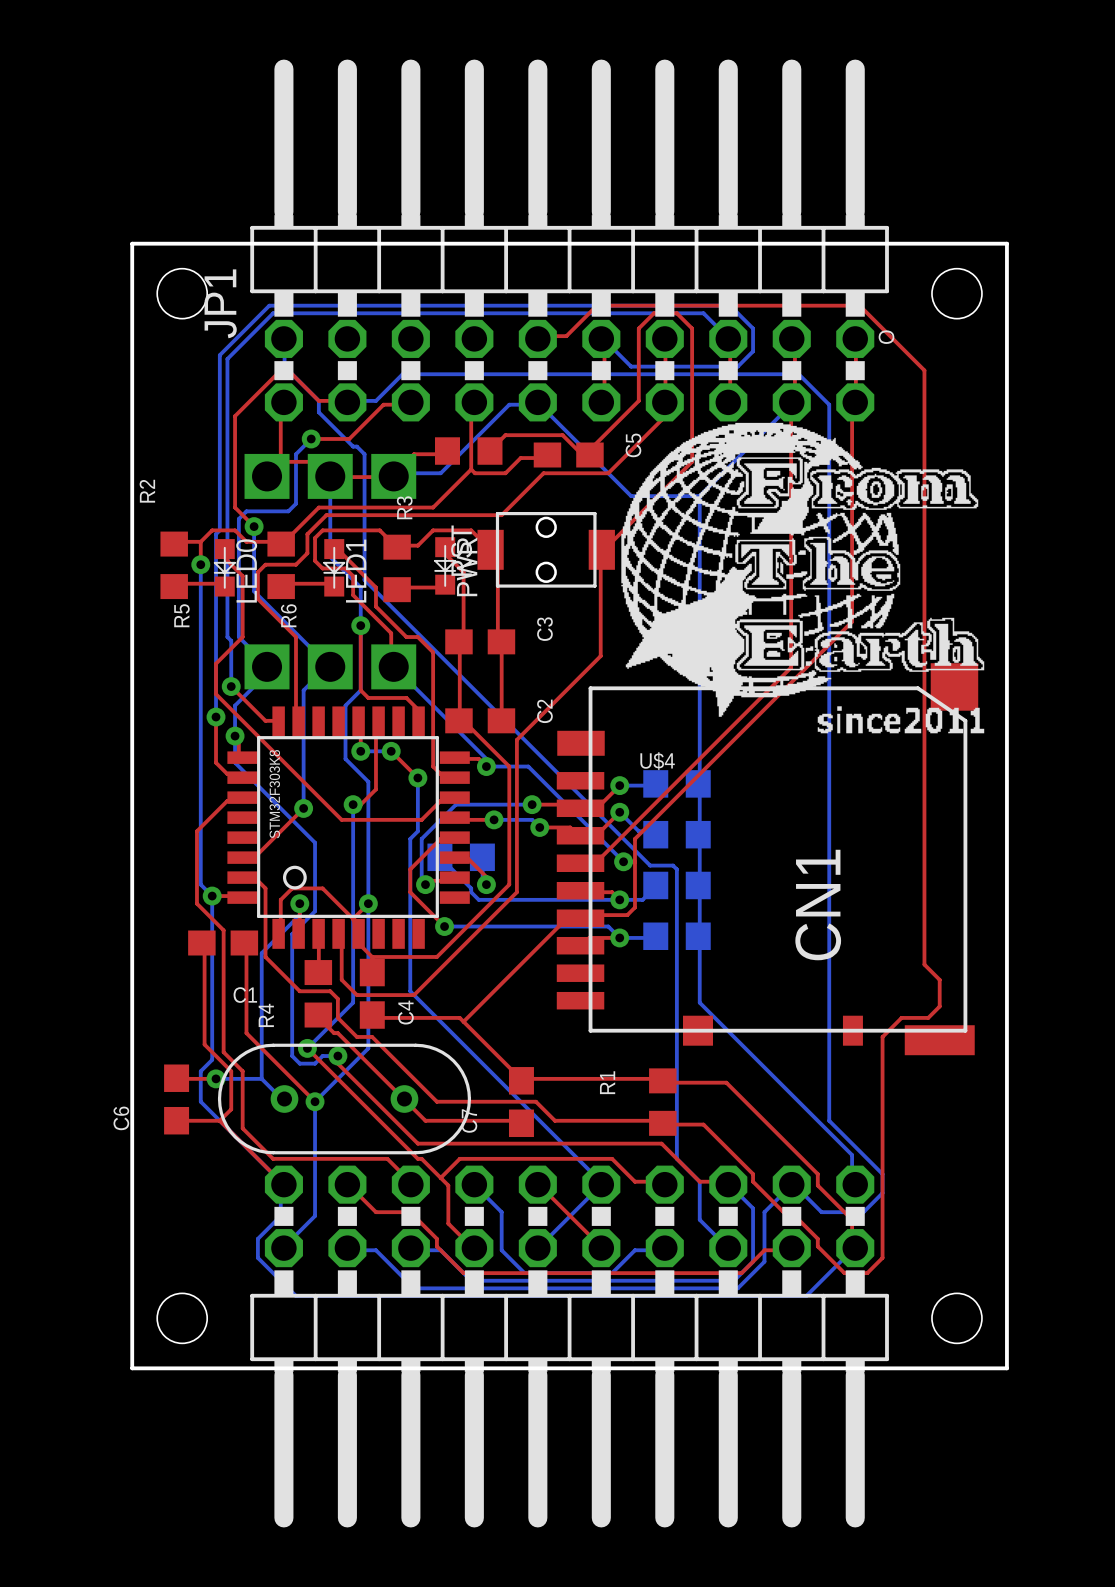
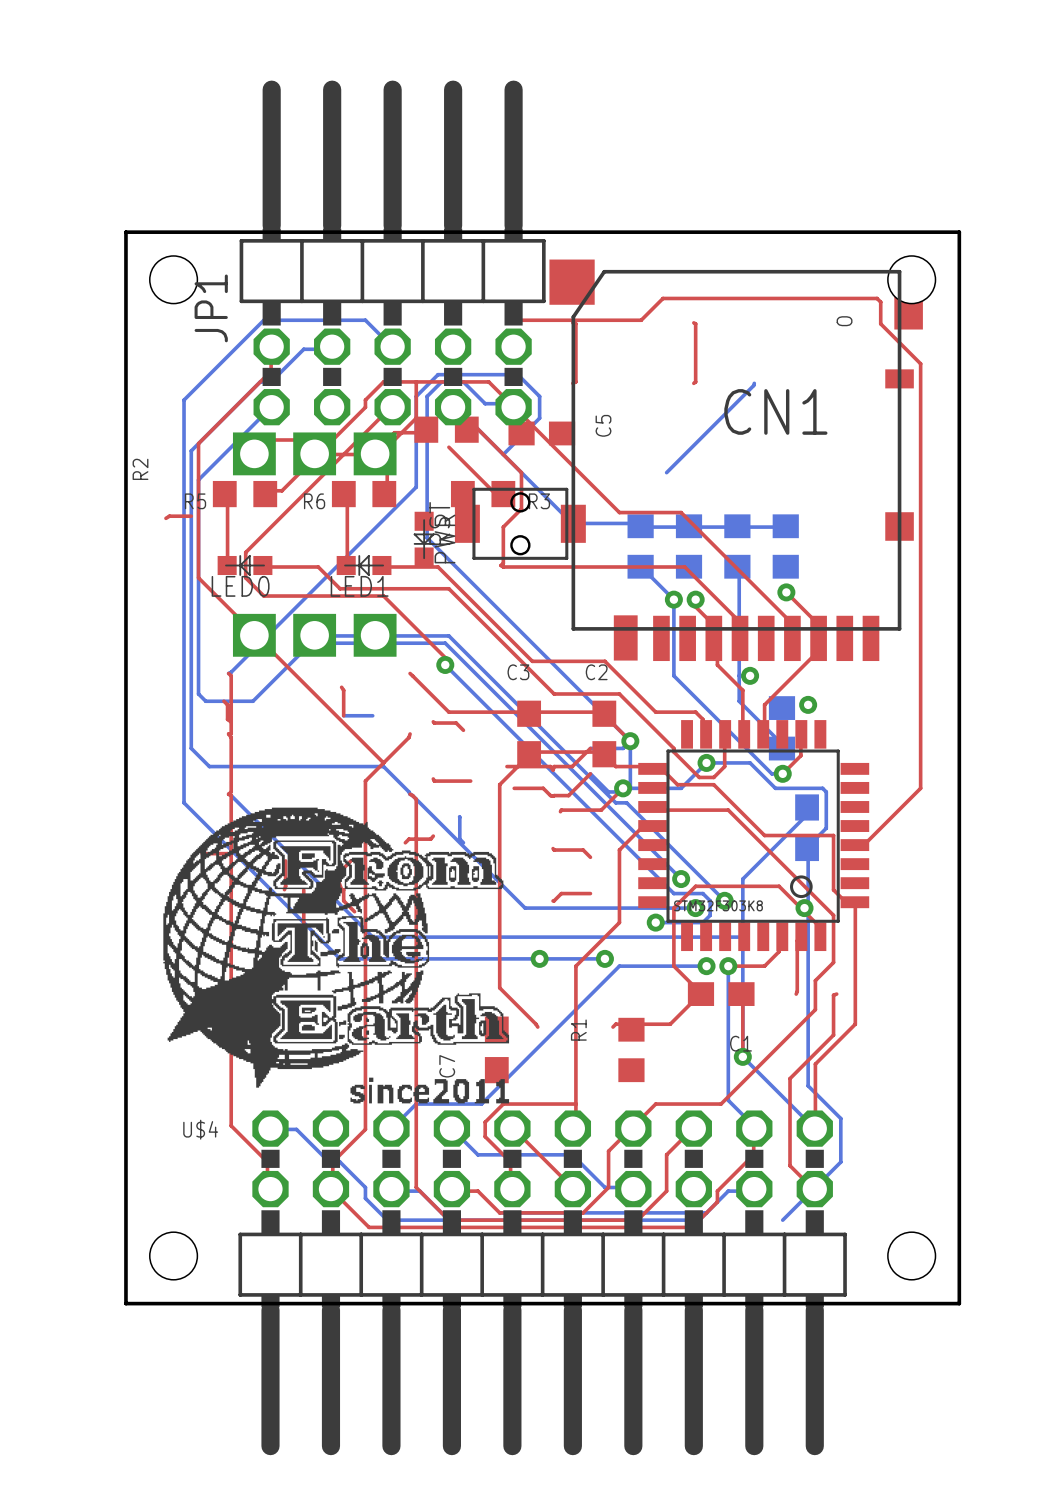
JP1 footprint: [250, 59, 889, 422] -> [239, 80, 546, 426]
JP1 name position: JP1 (220, 303) -> JP1 (211, 308)
top track: (566, 336) (596, 305) (859, 305) (924, 370) (924, 964) (939, 979) (939, 1006) (928, 1017) (901, 1017) (882, 1036) (882, 1257) (867, 1273) (844, 1273) (817, 1246) (817, 1238) (791, 1212) (783, 1212) (753, 1181) (753, 1174) (703, 1124) (665, 1124) (661, 1120) (555, 1120) (535, 1101) (436, 1101) (372, 1036) (356, 1036) (337, 1017) (337, 998) (330, 991) (299, 991) (265, 956) (265, 888) (257, 880) (242, 880) (242, 877) -> (539, 320) (641, 320) (663, 298) (877, 298) (880, 302) (880, 323) (920, 363) (920, 788) (866, 842) (855, 842) (854, 845)
bottom track: (283, 338) (284, 366) (318, 400) (318, 412) (353, 446) (356, 446) (364, 454) (364, 579) (650, 865) (673, 865) (676, 869) (676, 1158) (699, 1181) (699, 1219) (728, 1248) -> none
bottom track: (601, 338) (631, 366) (737, 366) (753, 351) (753, 328) (730, 305) (269, 305) (219, 355) (219, 530) (216, 534) (216, 717) -> none
top track: (664, 338) (665, 400) (661, 404) (661, 419) (608, 473) (543, 473) (501, 515) (326, 515) (307, 534) (307, 553) (296, 564) (265, 564) (257, 572) (257, 579) -> (392, 407) (245, 552)
bottom track: (728, 338) (703, 313) (273, 313) (227, 359) (227, 637) (231, 640) (231, 686) -> none
top track: (791, 338) (794, 339) (794, 400) (791, 404) (791, 667) (596, 861) (580, 863) -> none
top track: (855, 338) (855, 400) (852, 404) (852, 621) (634, 838) (634, 907) (627, 915) (581, 915) (577, 918) (566, 918) (463, 1021) -> none
top track: none -> (271, 346) (271, 371) (198, 443) (198, 577) (383, 762)
bottom track: none -> (332, 346) (329, 349) (303, 349) (271, 381) (260, 381) (191, 450) (191, 537)
bottom track: none -> (392, 346) (365, 320) (263, 320) (184, 400) (184, 802) (340, 958) (604, 958)
top track: none -> (416, 381) (416, 418) (387, 447) (387, 490) (384, 494)
top track: (283, 402) (280, 404) (280, 461) -> none
bottom track: (347, 402) (375, 400) (402, 374) (798, 374) (829, 404) (829, 1120) (848, 1139) -> (623, 788) (681, 788) (706, 762) (750, 762) (775, 788) (822, 788) (826, 791) (826, 828) (807, 847) (808, 1085)
top track: (347, 402) (318, 400) (292, 374) (276, 374) (235, 416) (235, 507) (254, 526) -> none
top track: (410, 402) (410, 404) (383, 404) (349, 438) (311, 438) -> none
top track: (474, 402) (471, 404) (471, 469) (433, 507) (318, 507) (281, 544) (280, 541) (246, 541) (235, 530) (212, 530) (200, 541) (200, 564) -> none
bottom track: none -> (271, 407) (198, 479) (198, 694) (205, 701) (252, 701) (318, 635) (448, 635) (615, 802) (626, 802) (724, 900)
bottom track: none -> (453, 407) (456, 407) (572, 523) (637, 523) (641, 527) (785, 526)
top track: none -> (453, 407) (456, 407) (521, 472) (521, 508) (503, 527) (503, 563) (500, 565) (684, 566) (739, 621) (740, 638)
bottom track: none -> (513, 407) (510, 403) (485, 403) (463, 381) (441, 381) (427, 396) (427, 537) (630, 741) (630, 788)
bottom track: (311, 438) (296, 454) (296, 503) (288, 511) (246, 511) (238, 518) (238, 637) (267, 666) (265, 675) (235, 705) (235, 762) (315, 842) (315, 911) (292, 934) (292, 1056) (299, 1063) (315, 1063) (322, 1056) (337, 1056) -> none
via: (311, 438) -> none
top track: (489, 451) (505, 435) (562, 435) (581, 454) (593, 454) (593, 446) (638, 400) (638, 328) (654, 313) (676, 313) (692, 328) (692, 461) (604, 549) (601, 549) (600, 656) (516, 739) (516, 892) (414, 995) (356, 995) (341, 979) (341, 934) (338, 933) -> none
top track: (547, 455) (547, 458) (520, 458) (505, 473) (475, 473) -> (503, 494) (503, 490) (492, 490) (452, 450)
bottom track: (330, 476) (330, 557) (360, 587) (360, 690) (345, 705) (345, 758) (368, 781) (368, 1048) (315, 1101) (315, 1215) (283, 1248) -> none
bottom track: (393, 476) (395, 473) (440, 473) (509, 404) (535, 404) (537, 402) (631, 496) (699, 496) (699, 1002) (852, 1155) (852, 1181) -> (807, 807) (804, 810) (804, 817) (742, 879) (742, 1056) (811, 1125)
bottom track: none -> (503, 454) (539, 418) (539, 396) (517, 374) (438, 374) (416, 396) (416, 487) (228, 673)
top track: none -> (224, 494) (227, 494) (227, 565)
top track: none -> (265, 494) (267, 490) (281, 490) (365, 407) (365, 400) (383, 381) (488, 381) (619, 512) (681, 512) (790, 621) (790, 635) (792, 638)
top track: none -> (343, 494) (347, 494) (346, 565)
bottom track: (254, 526) (254, 591) (330, 666) (326, 667) (303, 690) (303, 808) -> none
via: (254, 526) -> none
top track: (445, 547) (448, 549) (448, 557) (463, 572) (463, 637) (458, 641) (459, 717) -> none
top track: (224, 549) (227, 549) (227, 560) (242, 576) (242, 637) (216, 663) (216, 694) (341, 819) (421, 819) (440, 800) (452, 800) (454, 797) -> none
top track: (334, 549) (337, 549) (375, 587) (375, 606) (406, 637) (417, 637) (433, 652) (433, 766) (440, 774) (452, 774) (454, 777) -> none
via: (200, 564) -> none
R5 rotation: 0° (174, 565) -> 90° clockwise (245, 494)
R5 position: (174, 565) -> (245, 494)
R6 rotation: 0° (281, 565) -> 90° clockwise (364, 494)
R6 position: (281, 565) -> (364, 494)
LED0 rotation: 0° (224, 567) -> 90° clockwise (245, 565)
LED0 position: (224, 567) -> (245, 565)
LED1 rotation: 0° (334, 567) -> 90° clockwise (364, 565)
LED1 position: (334, 567) -> (364, 565)
R3 rotation: 0° (397, 568) -> 90° clockwise (483, 494)
R3 position: (397, 568) -> (483, 494)
part: none -> (640, 546)
part: none -> (689, 546)
part: none -> (737, 546)
part: none -> (785, 546)
U$4 position: (802, 578) -> (336, 955)
top track: (445, 584) (444, 587) (398, 587) (397, 589) -> none
top track: (174, 586) (177, 583) (223, 583) (224, 586) -> none
top track: (281, 586) (284, 583) (334, 583) (334, 586) -> none
top track: none -> (262, 565) (318, 566) (340, 588) (448, 588) (554, 694) (619, 694) (673, 748) (673, 752) (699, 777) (713, 777) (724, 766) (725, 734)
top track: none -> (381, 565) (438, 566) (532, 661) (604, 661) (655, 712) (695, 712) (702, 719) (702, 733) (706, 734)
bottom track: none -> (640, 566) (673, 599) (673, 675) (771, 773) (782, 773)
bottom track: none -> (737, 566) (739, 566) (739, 701) (779, 741) (779, 748) (781, 748)
top track: (257, 598) (296, 637) (296, 720) (298, 721) -> (245, 570) (245, 577) (263, 596) (383, 596) (445, 657) (445, 664)
top track: none -> (786, 592) (815, 621) (815, 635) (818, 638) (815, 639) (815, 654) (764, 704) (763, 734)
via: none -> (786, 592)
top track: (360, 625) (360, 690) (368, 697) (406, 697) (417, 709) (418, 721) -> none
via: (360, 625) -> none
C3 name position: C3 (544, 629) -> C3 (518, 672)
via: none -> (673, 599)
top track: none -> (695, 599) (695, 606) (713, 625) (713, 638) (717, 639) (717, 664) (742, 690) (744, 734)
via: none -> (695, 599)
C3 rotation: 0° (480, 641) -> 90° clockwise (529, 733)
C3 position: (480, 641) -> (529, 733)
bottom track: (393, 666) (486, 758) (486, 766) (528, 766) (623, 861) -> none
top track: (393, 666) (391, 663) (391, 633) (353, 595) (353, 576) (345, 568) (322, 568) (315, 560) (315, 538) (322, 530) (379, 530) (397, 547) (417, 545) (433, 530) (471, 530) (497, 557) (497, 640) (501, 641) (501, 644) (501, 720) -> none
bottom track: none -> (325, 650) (332, 643) (445, 643) (681, 879)
top track: (231, 686) (265, 720) (278, 721) -> none
via: (231, 686) -> none
bottom track: none -> (445, 664) (673, 893) (702, 893) (710, 900) (710, 915) (702, 922) (655, 922)
via: none -> (445, 664)
top track: none -> (410, 673) (448, 712) (528, 712) (529, 713) (532, 712) (601, 712) (630, 741)
via: none -> (750, 675)
C2 name position: C2 (544, 711) -> C2 (596, 672)
top track: (216, 717) (216, 762) (227, 774) (238, 774) (242, 777) -> none
via: (216, 717) -> none
top track: (459, 717) (509, 766) (509, 884) (436, 956) (372, 956) (372, 972) -> none
C2 rotation: 0° (480, 720) -> 90° clockwise (604, 733)
C2 position: (480, 720) -> (604, 733)
top track: (378, 721) (375, 724) (375, 789) (360, 804) (353, 804) -> none
via: (235, 736) -> none
via: none -> (808, 704)
via: (360, 751) -> none
top track: (391, 751) (417, 777) -> none
via: (391, 751) -> none
part: none -> (781, 728)
via: (486, 766) -> none
top track: none -> (410, 733) (409, 737) (365, 781) (365, 1129) (332, 1162) (332, 1187) (330, 1189) (369, 1227) (692, 1227) (706, 1212)
top track: none -> (801, 734) (800, 755) (782, 773)
bottom track: (417, 777) (417, 831) (410, 838) (410, 991) (600, 1181) (600, 1185) (537, 1248) -> none
via: (417, 777) -> none
via: none -> (630, 741)
part: (677, 783) -> none
bottom track: (200, 785) (200, 884) (212, 896) (212, 1059) (200, 1071) (200, 1101) (283, 1184) (280, 1185) (280, 1215) (257, 1238) (257, 1257) (296, 1295) (806, 1295) (821, 1280) -> (191, 748) (209, 766) (383, 766) (525, 908) (695, 908)
via: (619, 785) -> none
top track: (242, 797) (238, 800) (227, 800) (196, 831) (196, 903) (223, 930) (223, 1052) (242, 1071) -> (228, 673) (231, 675) (231, 733) (228, 733) (231, 737) (231, 791) (228, 794) (231, 795) (231, 1020)
via: none -> (706, 762)
bottom track: (353, 804) (353, 1002) (307, 1048) -> none
via: (353, 804) -> none
bottom track: (532, 804) (455, 804) (421, 838) (421, 877) (425, 880) (425, 884) -> none
via: (532, 804) -> none
top track: (303, 808) (257, 854) (242, 854) (242, 857) -> none
via: (303, 808) -> none
via: (619, 812) -> none
via: none -> (782, 773)
bottom track: (494, 819) (532, 819) (539, 827) -> none
via: (494, 819) -> none
part: (348, 827) -> none
via: (539, 827) -> none
top track: none -> (623, 788) (601, 810) (561, 810) (560, 811)
via: none -> (623, 788)
bottom track: none -> (228, 794) (372, 937) (742, 937)
part: (677, 834) -> none
top track: (454, 837) (440, 838) (410, 869) (410, 892) (444, 926) -> none
bottom track: (439, 857) (471, 888) (471, 892) (478, 899) (642, 899) (655, 885) -> none
top track: (454, 857) (467, 857) (486, 877) (486, 884) -> none
part: (461, 857) -> none
CN1 rotation: 0° (767, 859) -> 90° counterclockwise (736, 460)
CN1 position: (767, 859) -> (736, 460)
via: (623, 861) -> none
top track: none -> (652, 826) (652, 828) (641, 828) (619, 850) (619, 922) (575, 966) (575, 1125) (572, 1128)
part: none -> (753, 835)
via: (425, 884) -> none
via: (486, 884) -> none
part: (677, 885) -> none
via: (212, 896) -> none
via: (619, 899) -> none
bottom track: (299, 903) (299, 915) (261, 953) (261, 1078) -> none
via: (299, 903) -> none
via: (368, 903) -> none
via: none -> (681, 879)
bottom track: (444, 926) (608, 926) (619, 937) (654, 937) (655, 936) -> none
via: (444, 926) -> none
top track: (278, 933) (280, 930) (280, 899) (292, 888) (322, 888) (356, 922) (358, 933) -> none
part: (677, 936) -> none
via: (619, 937) -> none
top track: (201, 943) (204, 945) (204, 1044) (231, 1071) (231, 1109) (219, 1120) -> none
C1 position: (223, 943) -> (721, 994)
top track: (244, 943) (246, 945) (246, 1033) (315, 1101) -> none
via: none -> (724, 900)
via: none -> (695, 908)
via: none -> (804, 908)
via: none -> (655, 922)
top track: none -> (782, 936) (779, 937) (779, 951) (764, 966) (728, 966)
top track: none -> (801, 936) (797, 940) (796, 994)
top track: none -> (820, 936) (819, 926) (779, 886) (695, 886) (673, 908) (673, 966) (700, 994) (670, 1024) (615, 1024) (612, 1027)
R4: (318, 993) -> none
C4 side: top (372, 993) -> bottom (807, 827)
via: none -> (539, 958)
via: none -> (604, 958)
bottom track: none -> (706, 966) (619, 966) (481, 1104) (416, 1104) (391, 1128)
via: none -> (706, 966)
bottom track: none -> (728, 966) (728, 1100) (754, 1128)
via: none -> (728, 966)
top track: (318, 1015) (318, 1017) (334, 1033) (337, 1033) (425, 1120) (520, 1120) (521, 1123) -> none
top track: (372, 1015) (375, 1017) (459, 1017) (521, 1080) (524, 1078) (661, 1078) (665, 1082) (726, 1082) (817, 1174) (817, 1185) (852, 1219) (852, 1246) -> (836, 994) (833, 995) (833, 1035) (790, 1078) (790, 1165) (811, 1187)
top track: none -> (741, 994) (742, 1056)
top track: (307, 1048) (417, 1158) (421, 1158) (448, 1185) (448, 1223) (474, 1248) -> none
via: (307, 1048) -> none
top track: (337, 1056) (337, 1063) (417, 1143) (661, 1143) (699, 1181) (726, 1181) (728, 1184) -> (441, 1212) (448, 1220) (637, 1220) (666, 1191) (666, 1154) (693, 1128)
via: (337, 1056) -> none
top track: (176, 1078) (216, 1078) -> none
bottom track: (216, 1078) (261, 1078) -> none
via: (216, 1078) -> none
bottom track: (261, 1078) (280, 1097) (284, 1099) -> none
top track: none -> (537, 1027) (499, 987) (499, 784) (532, 752) (601, 752) (615, 766) (652, 766) (655, 770) (663, 770) (677, 784) (713, 784) (764, 835) (833, 835) (833, 889) (844, 900) (854, 902) (855, 1024) (815, 1064) (814, 1128)
C6: (176, 1099) -> none
part: (344, 1099) -> none
via: (315, 1101) -> none
via: none -> (742, 1056)
top track: (176, 1120) (219, 1120) -> none
top track: (219, 1120) (283, 1184) -> none
top track: (242, 1128) (273, 1158) (387, 1158) (410, 1181) (410, 1184) -> (231, 1075) (231, 1125) (267, 1162) (267, 1187) (270, 1189)
top track: (528, 1158) (459, 1158) (440, 1177) -> (503, 1104) (485, 1122) (485, 1136) (510, 1162) (510, 1187) (512, 1189)
top track: (604, 1158) (612, 1158) (634, 1181) (661, 1181) (664, 1184) -> none
top track: (347, 1184) (375, 1212) (410, 1212) (436, 1238) -> (410, 794) (416, 799) (416, 1180)
bottom track: (728, 1184) (753, 1208) (753, 1261) -> (754, 1189) (753, 1191) (728, 1191) (717, 1202)
bottom track: (882, 1193) (863, 1212) (821, 1212) (794, 1185) (791, 1184) (764, 1212) (764, 1261) (737, 1288) (414, 1288) (406, 1280) -> (448, 1220) (387, 1220)
bottom track: none -> (840, 1136) (840, 1162) (814, 1189)
bottom track: (501, 1212) (501, 1250) (524, 1273) -> (477, 1154) (572, 1154) (604, 1187) (633, 1189)
bottom track: (347, 1248) (349, 1250) (375, 1250) (383, 1257) -> (270, 1128) (296, 1129) (329, 1162) (340, 1162) (365, 1187) (365, 1198)
bottom track: (664, 1248) (661, 1250) (634, 1250) (612, 1273) -> (706, 1212) (583, 1212)
top track: (791, 1248) (791, 1250) (764, 1250) (753, 1261) -> (754, 1128) (753, 1154) (717, 1191) (717, 1202)
top track: (463, 1273) (524, 1273) -> (451, 1189) (452, 1191) (477, 1191) (499, 1212)
top track: (612, 1273) (741, 1273) -> (583, 1212) (608, 1187) (608, 1151) (630, 1129) (633, 1128) (655, 1104) (721, 1104) (815, 1009) (815, 980) (833, 962) (833, 915) (728, 810) (655, 810) (652, 806)

